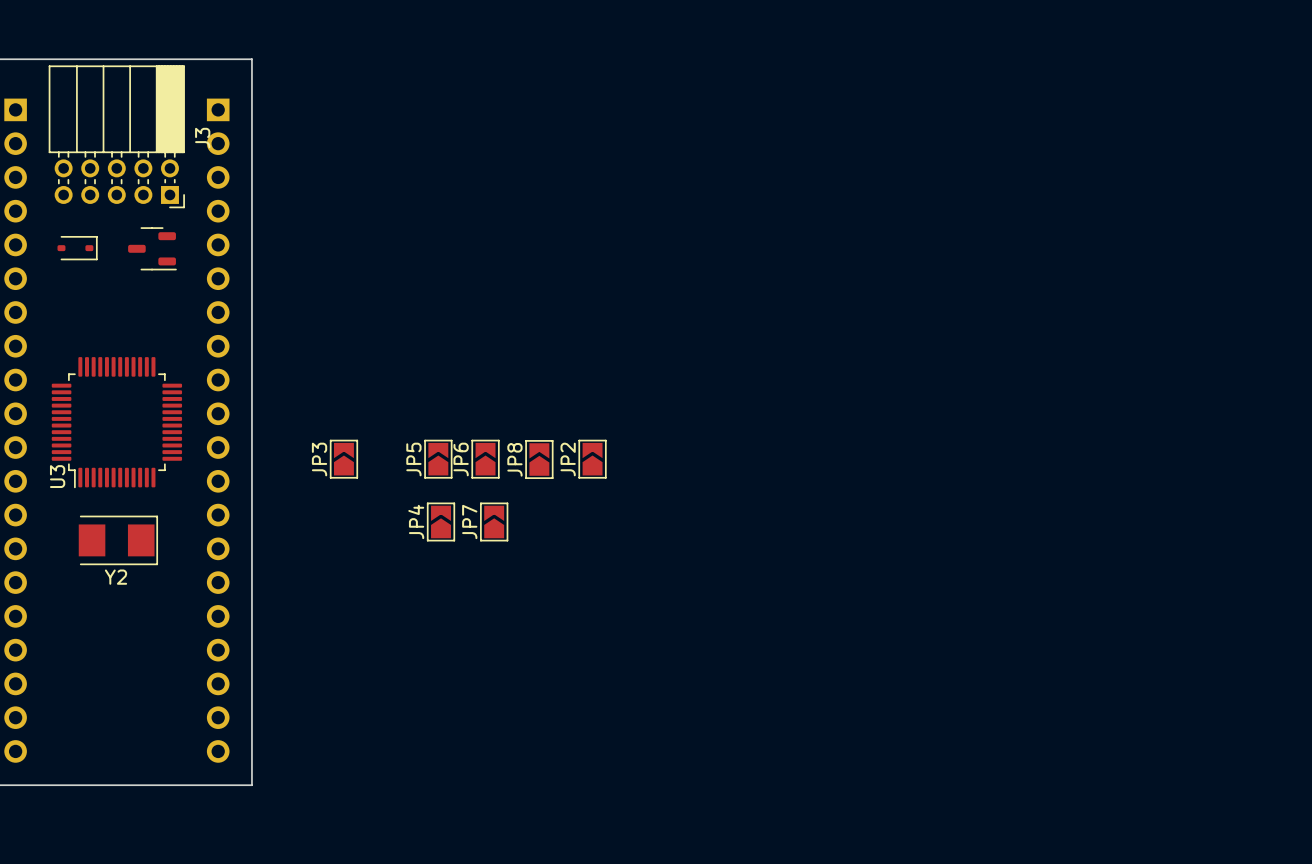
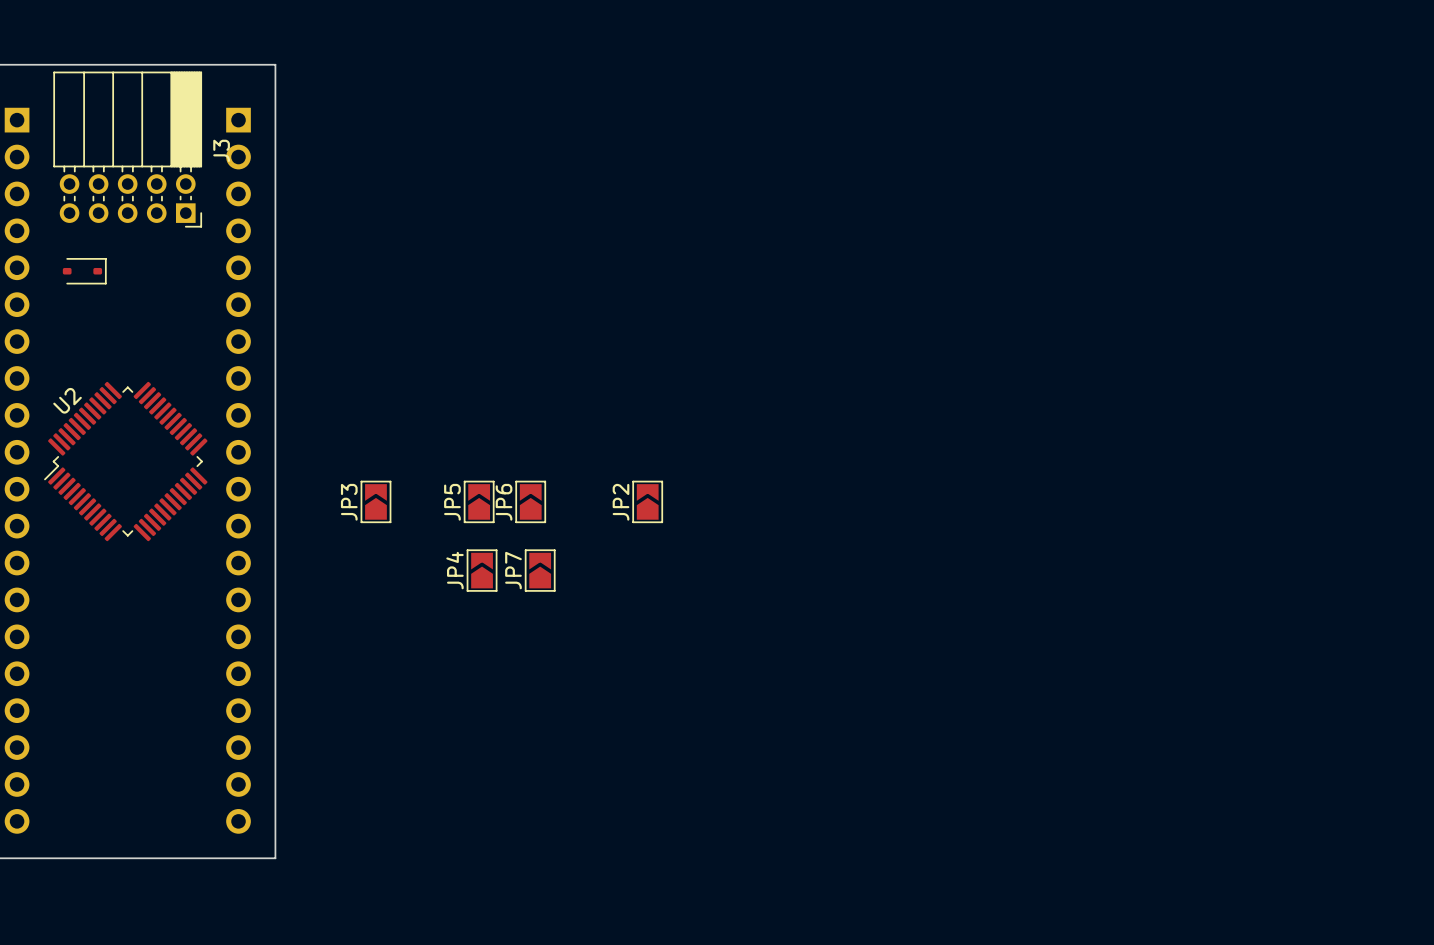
part: (152, 248) -> none
U2: none -> (125, 461)
U3: (116, 422) -> none
JP8: (539, 459) -> none
Y2: (118, 540) -> none

